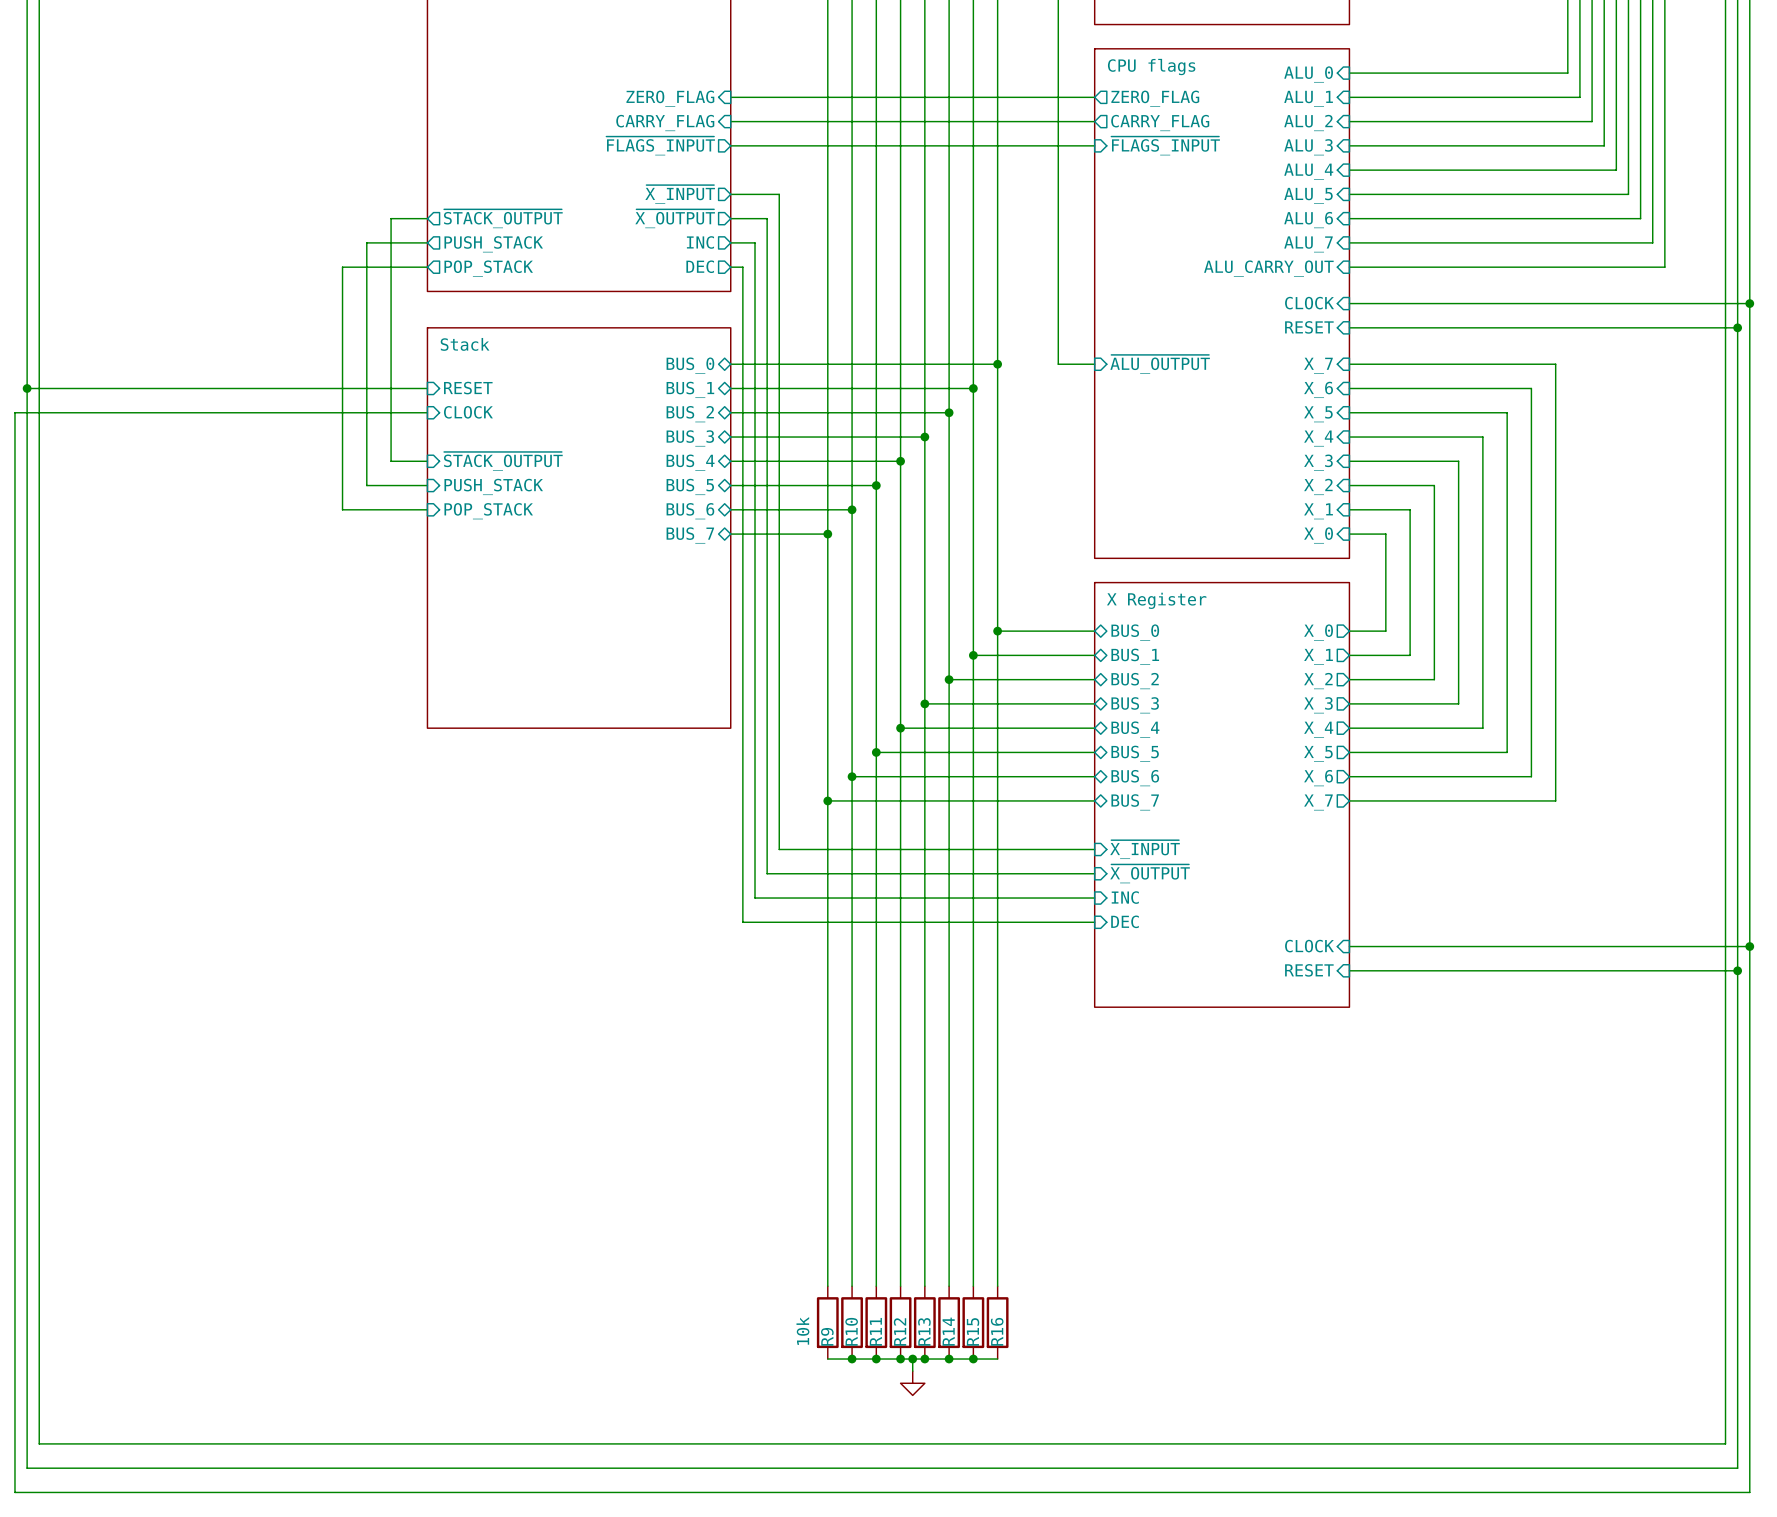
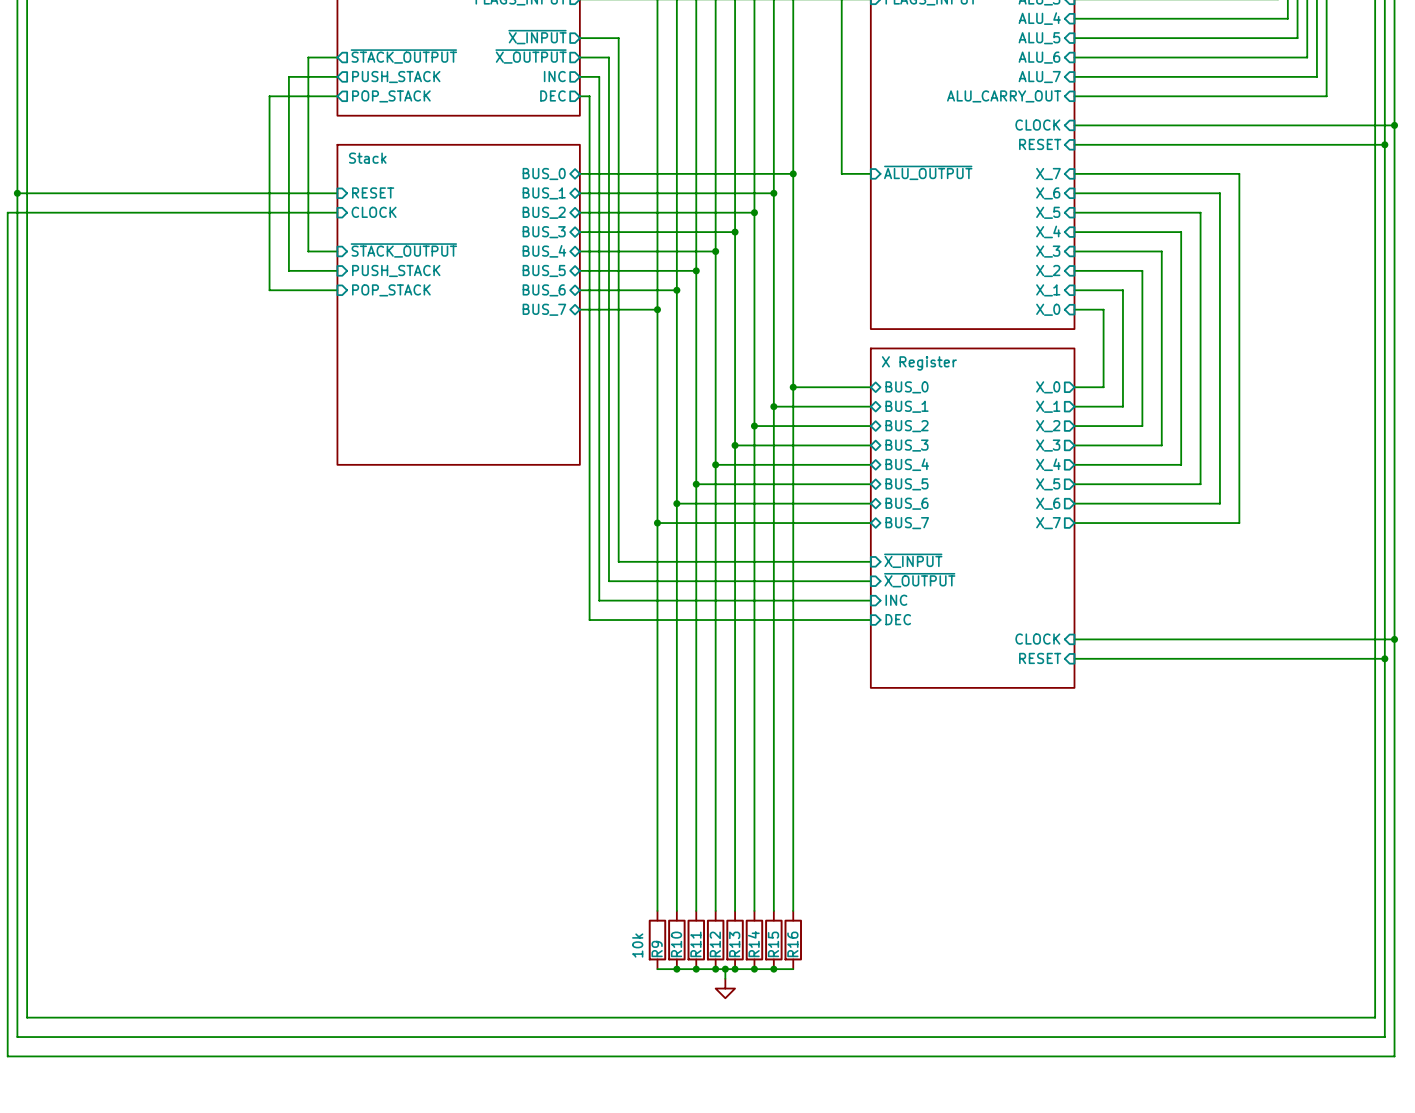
wire: (39, 1419) (39, 1443) -> (17, 1037) (27, 1037)
wire: none -> (27, 1017) (1375, 1017)
wire: (1725, 1419) (1725, 1443) -> (1384, 1037) (1375, 1037)
wire: (27, 1443) (27, 1468) -> (7, 1056) (17, 1056)
wire: (1737, 1443) (1737, 1468) -> (1394, 1056) (1384, 1056)
wire: (14, 1468) (14, 1492) (1749, 1492) (1749, 1468) -> none

